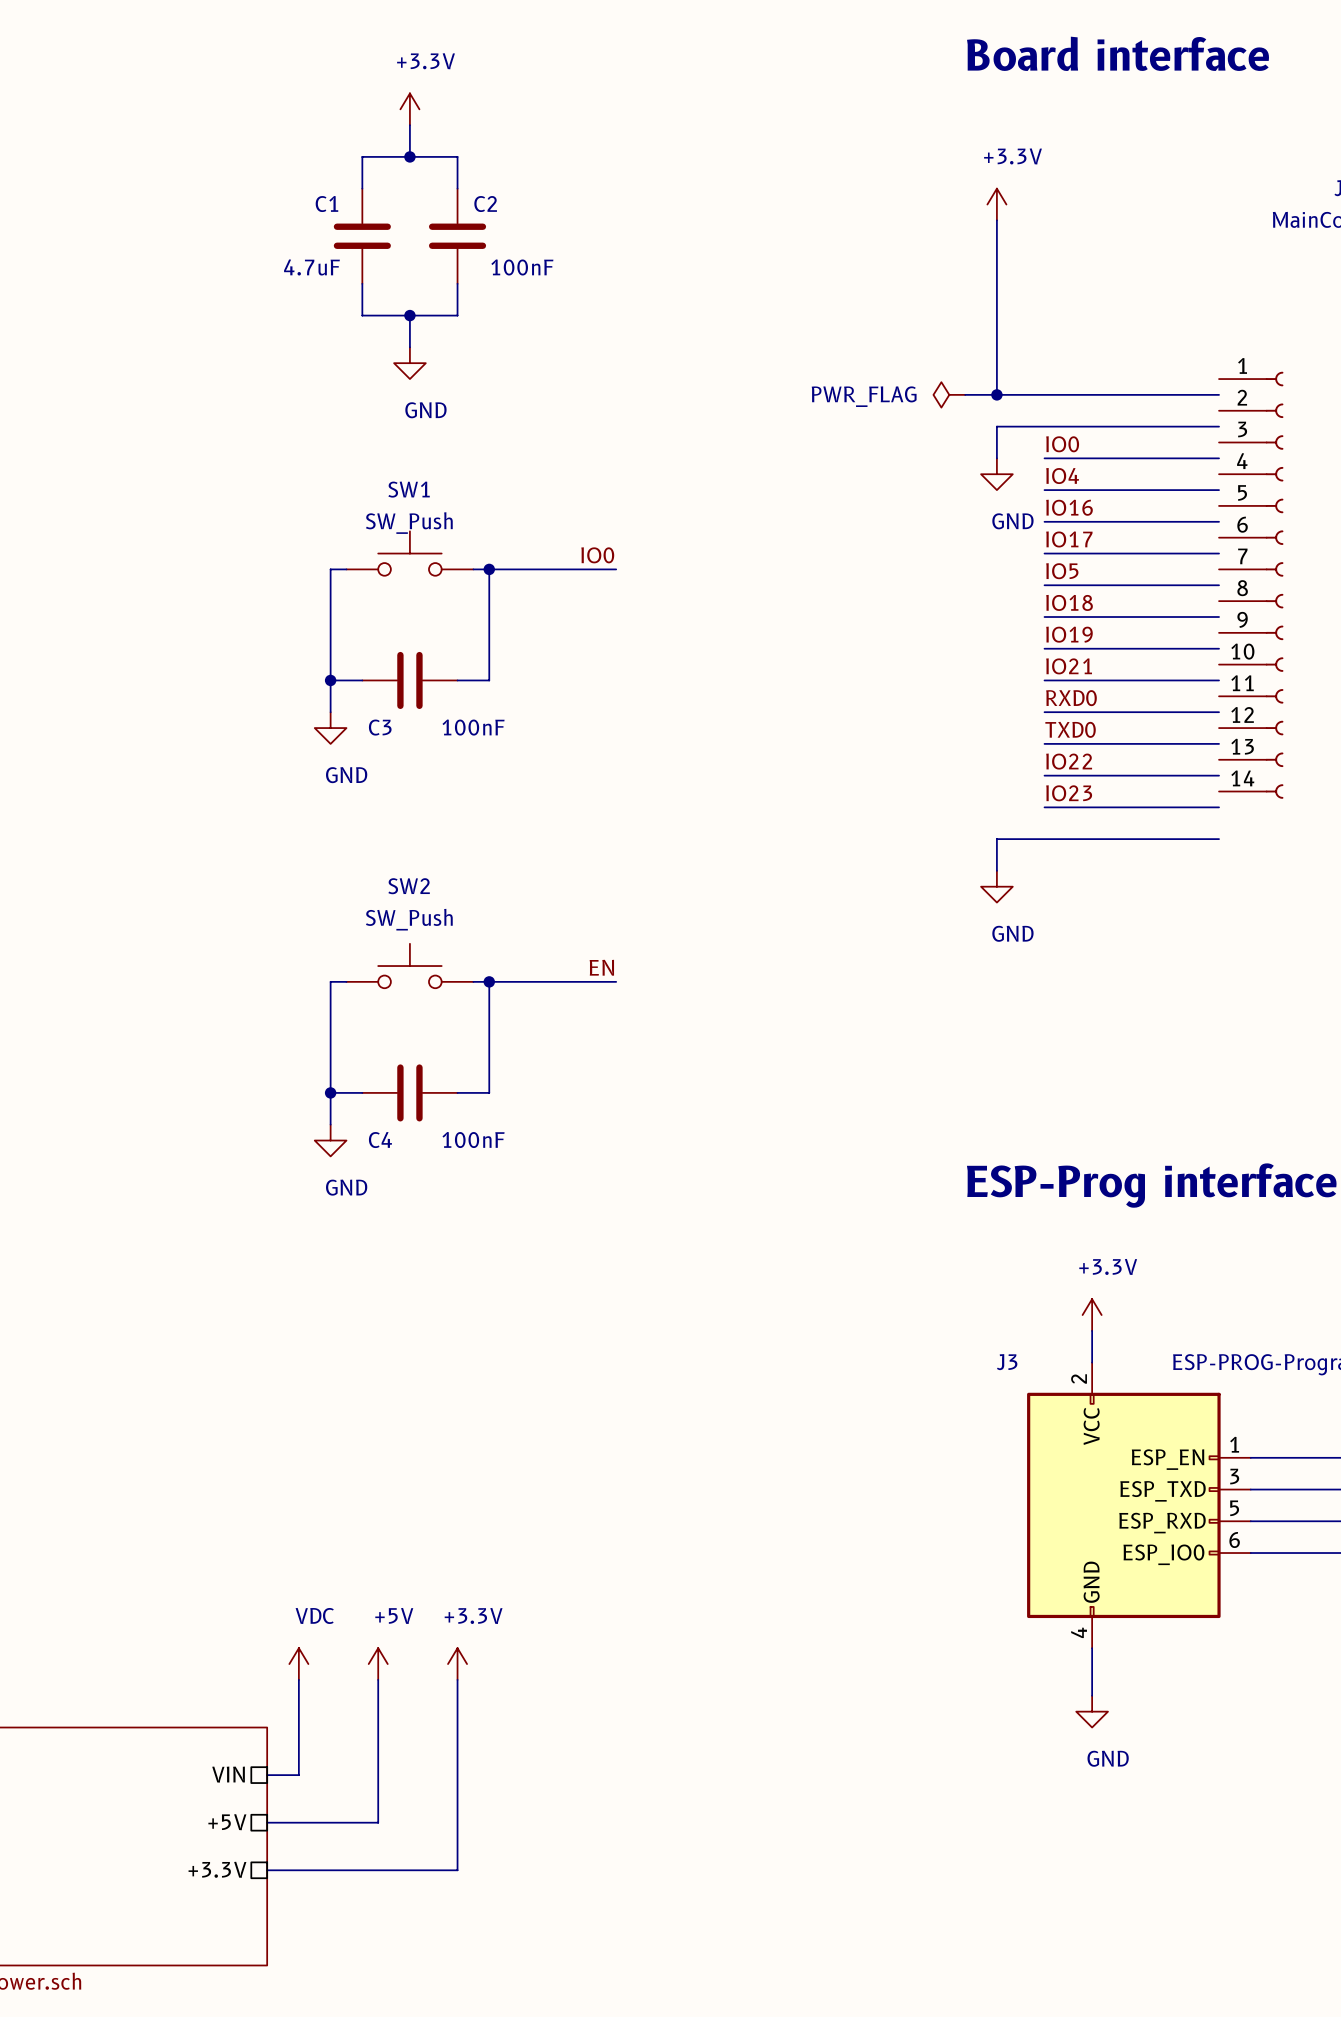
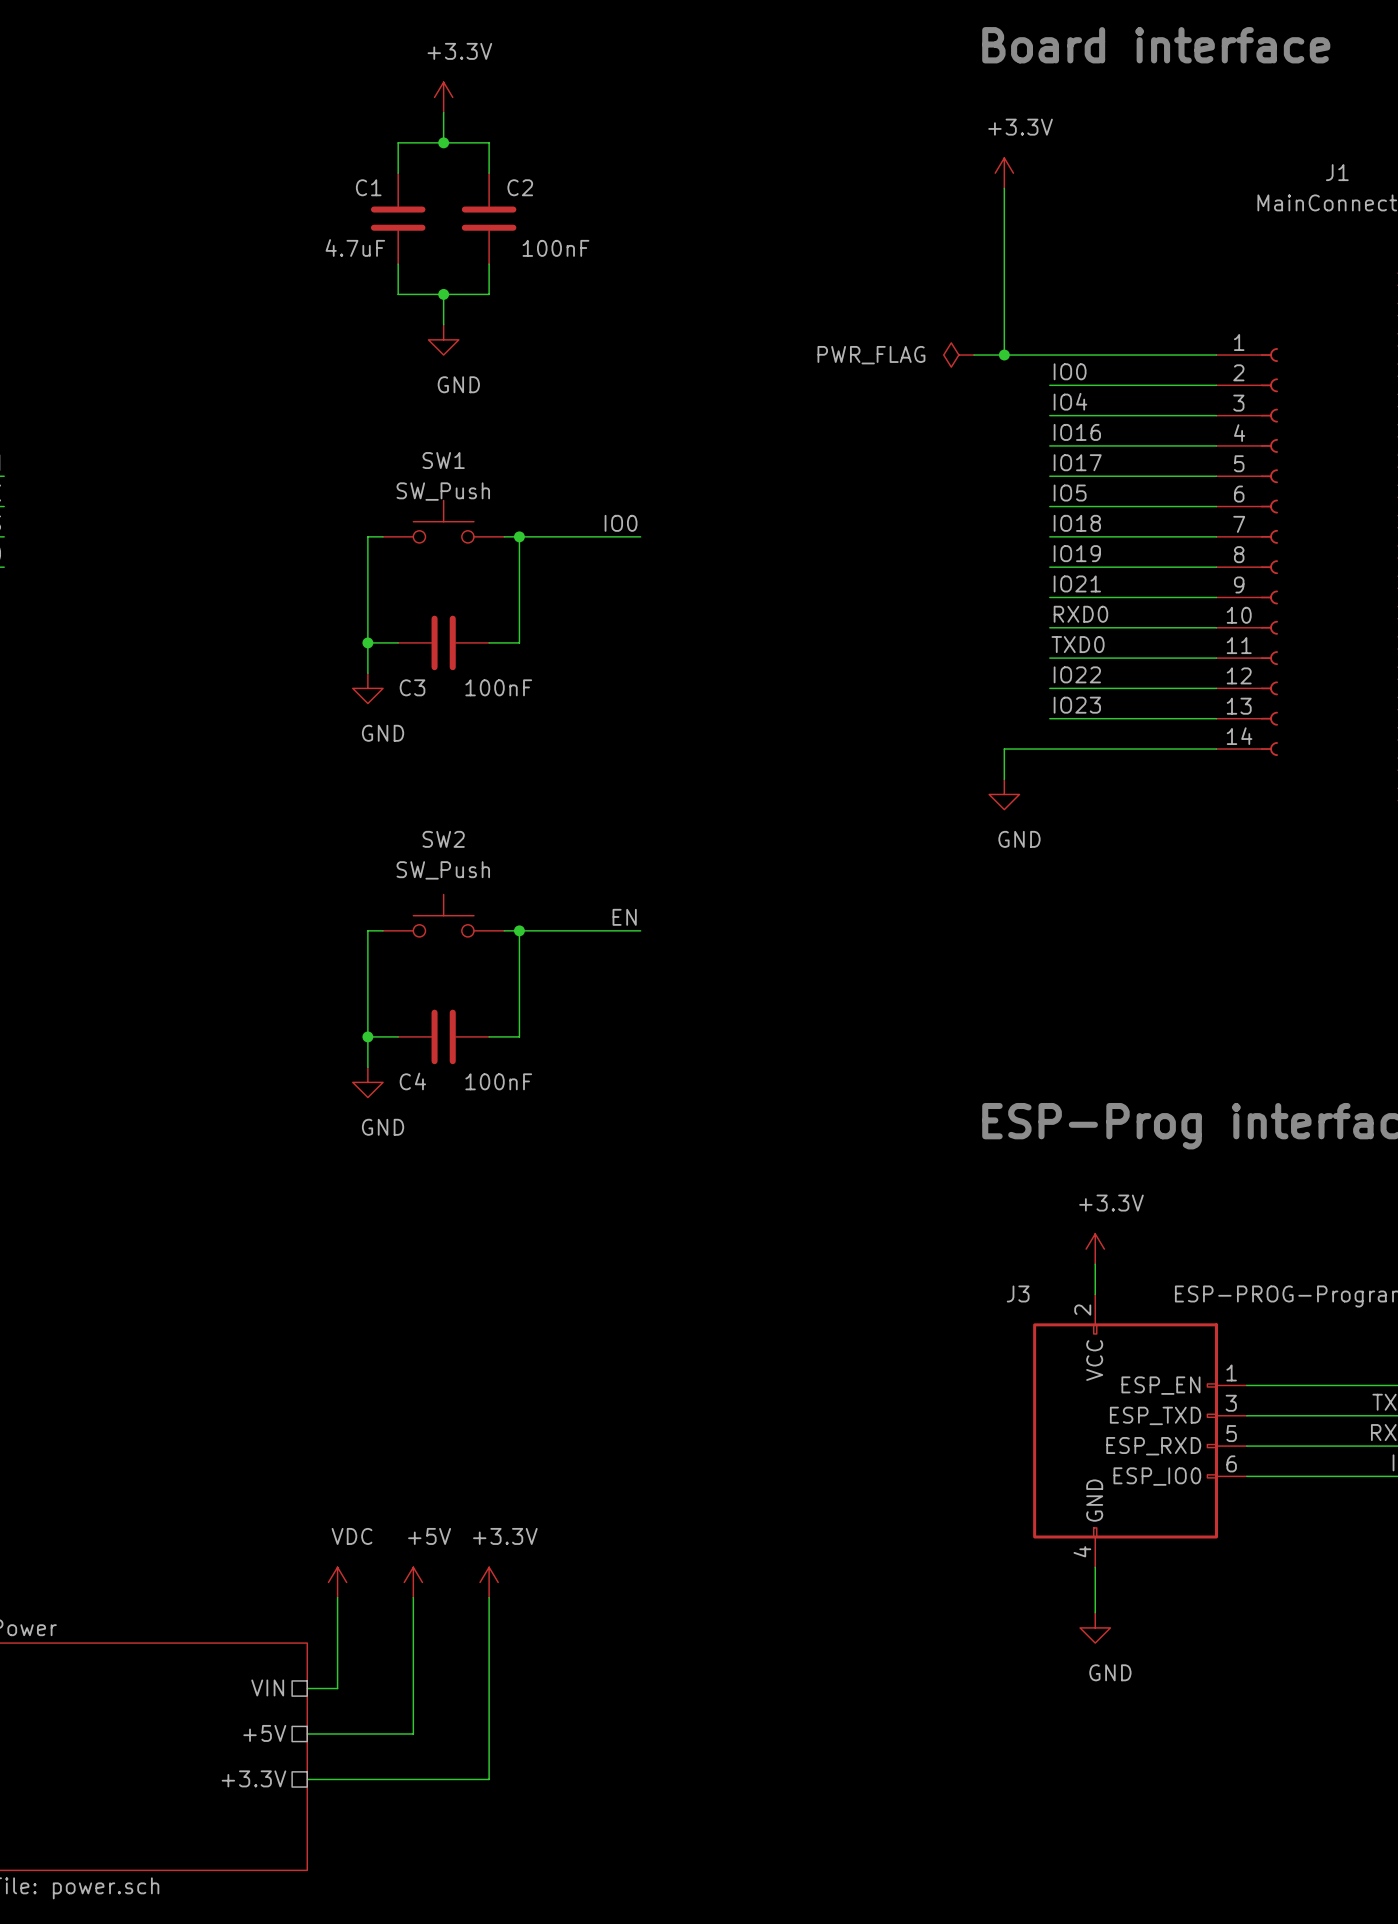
power symbol position: +3.3V (996, 204) -> +3.3V (1004, 173)
power symbol position: PWR_FLAG (949, 394) -> PWR_FLAG (958, 355)
wire: (965, 394) (1219, 394) -> (974, 355) (1216, 355)
junction position: (996, 394) -> (1004, 355)
wire: (1219, 426) (996, 426) (996, 458) -> none
label position: IO0 (1062, 444) -> IO0 (1070, 371)
wire: (1044, 458) (1219, 458) -> (1049, 385) (1216, 385)
power symbol: GND (996, 474) -> none
label position: IO4 (1062, 476) -> IO4 (1070, 401)
wire: (1044, 490) (1219, 490) -> (1049, 415) (1216, 415)
label position: IO16 (1069, 507) -> IO16 (1077, 432)
wire: (1044, 521) (1219, 521) -> (1049, 445) (1216, 445)
label position: IO17 (1069, 539) -> IO17 (1077, 462)
wire: (1044, 553) (1219, 553) -> (1049, 476) (1216, 476)
label position: IO5 (1062, 571) -> IO5 (1070, 493)
wire: (1044, 585) (1219, 585) -> (1049, 506) (1216, 506)
label position: IO18 (1069, 602) -> IO18 (1077, 523)
wire: (1044, 617) (1219, 617) -> (1049, 536) (1216, 536)
label position: IO19 (1069, 634) -> IO19 (1077, 553)
wire: (1044, 648) (1219, 648) -> (1049, 567) (1216, 567)
label position: IO21 (1069, 666) -> IO21 (1077, 583)
wire: (1044, 680) (1219, 680) -> (1049, 597) (1216, 597)
label position: RXD0 (1071, 698) -> RXD0 (1080, 614)
wire: (1044, 712) (1219, 712) -> (1049, 627) (1216, 627)
label position: TXD0 (1070, 729) -> TXD0 (1078, 644)
wire: (1044, 743) (1219, 743) -> (1049, 658) (1216, 658)
label position: IO22 (1069, 761) -> IO22 (1077, 674)
wire: (1044, 775) (1219, 775) -> (1049, 688) (1216, 688)
label position: IO23 (1069, 793) -> IO23 (1077, 705)
wire: (1044, 807) (1219, 807) -> (1049, 718) (1216, 718)
wire: (1219, 839) (996, 839) (996, 870) -> (1216, 749) (1004, 749) (1004, 779)
power symbol position: GND (996, 886) -> GND (1004, 794)

